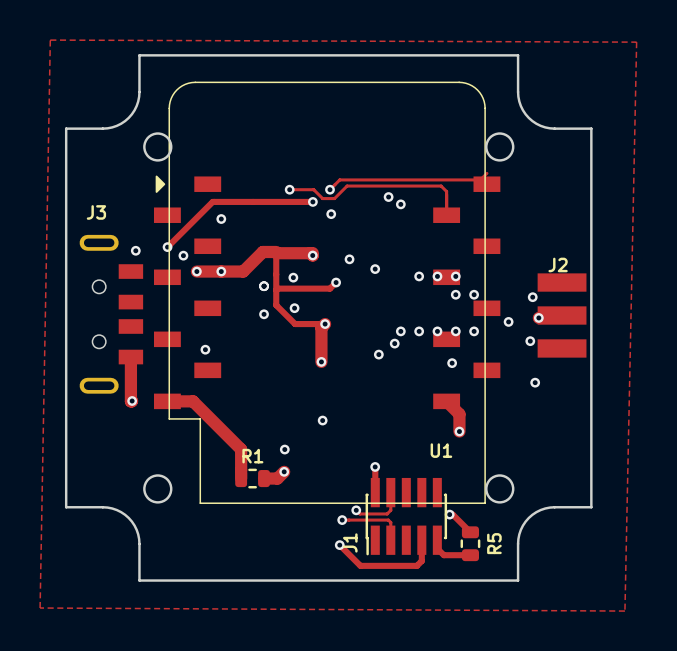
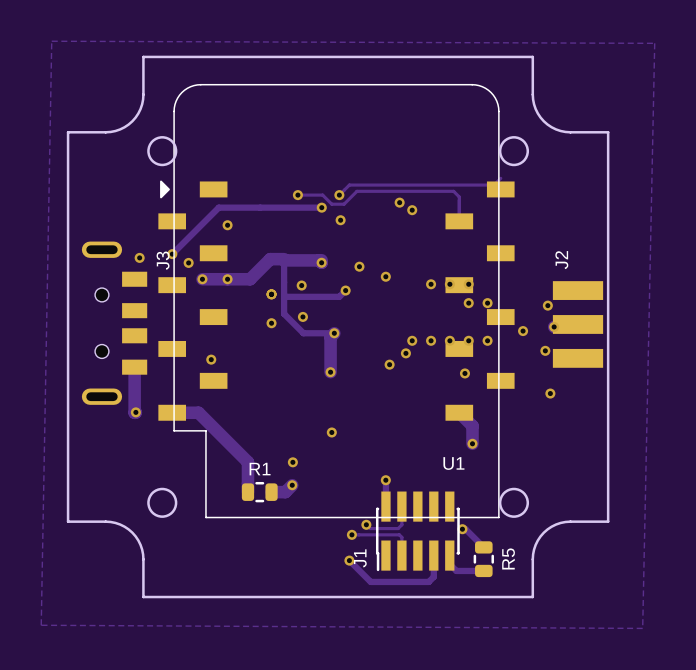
J3 name rotation: 0° (96, 212) -> 90° counterclockwise (163, 260)
J3 name position: J3 (96, 212) -> J3 (163, 260)
J2 name rotation: 0° (558, 264) -> 90° counterclockwise (561, 260)

